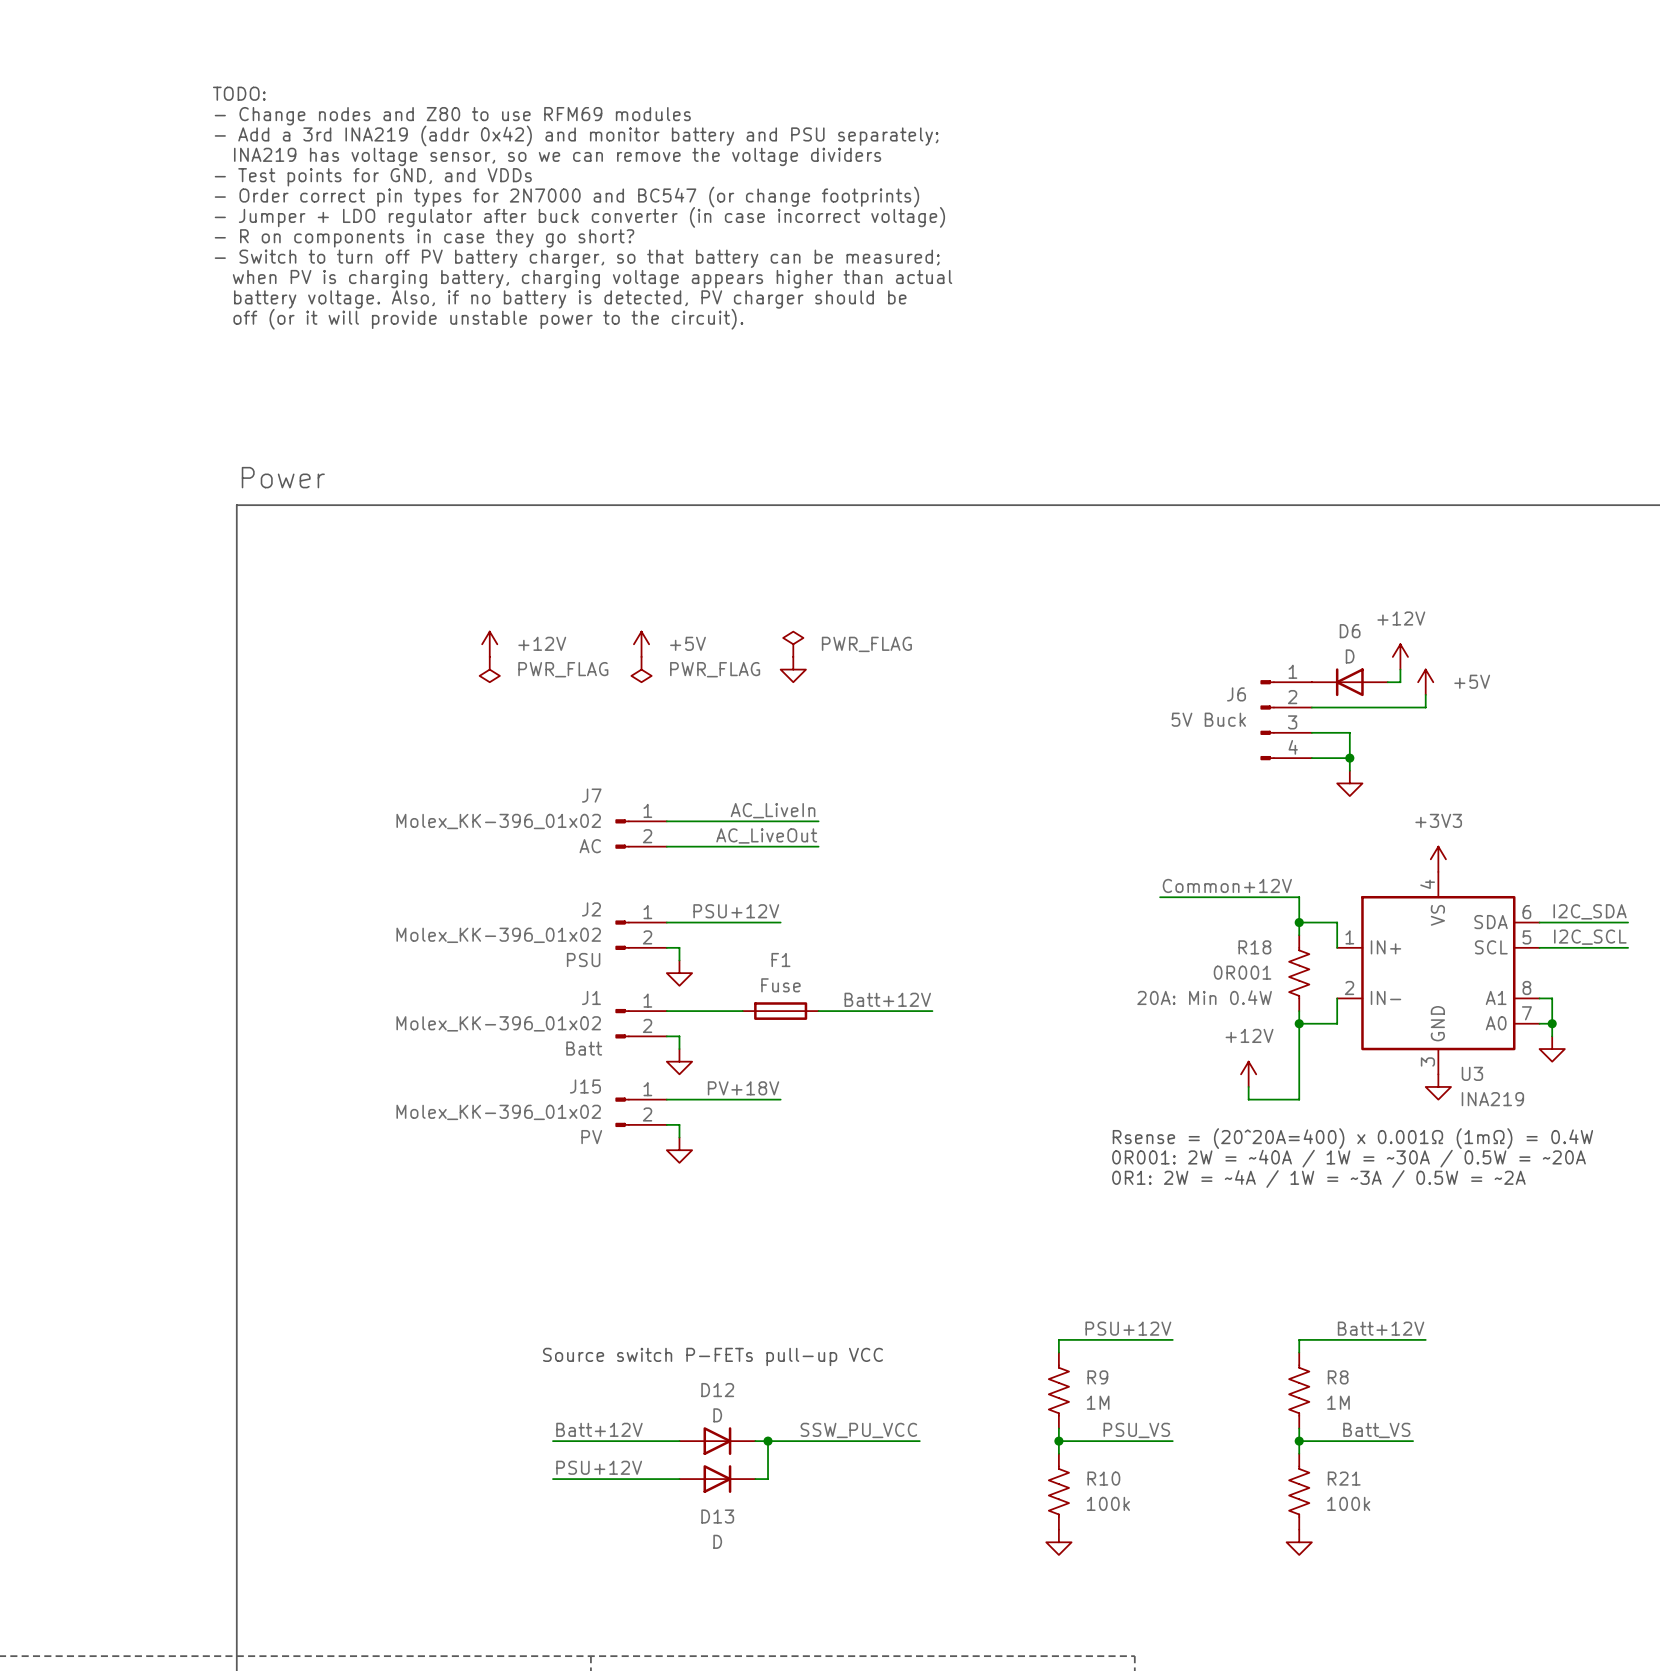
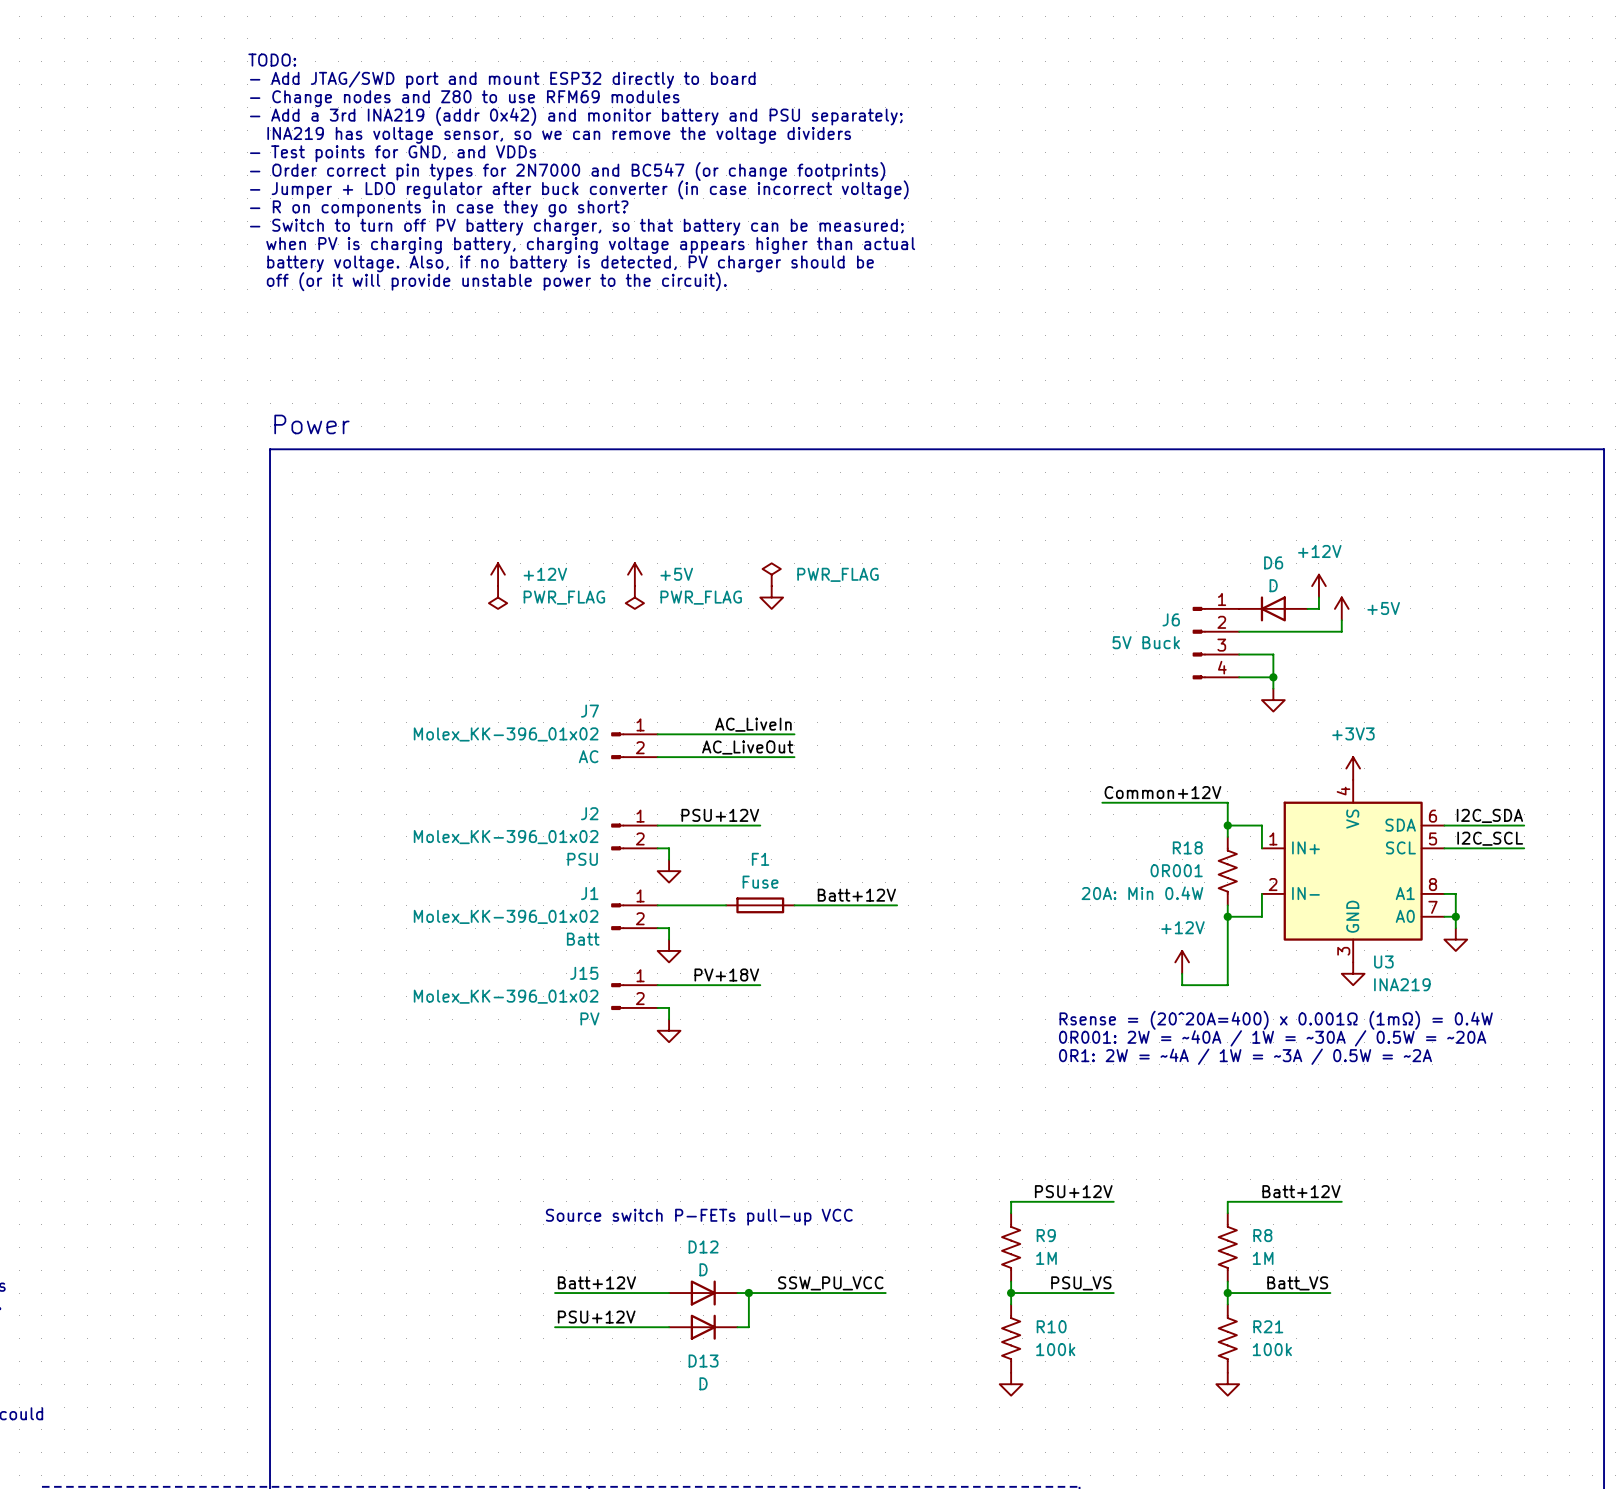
text: none -> TODO: (272, 60)
text: TODO: (239, 93) -> - Add JTAG/SWD port and mount ESP32 directly to board (502, 80)

